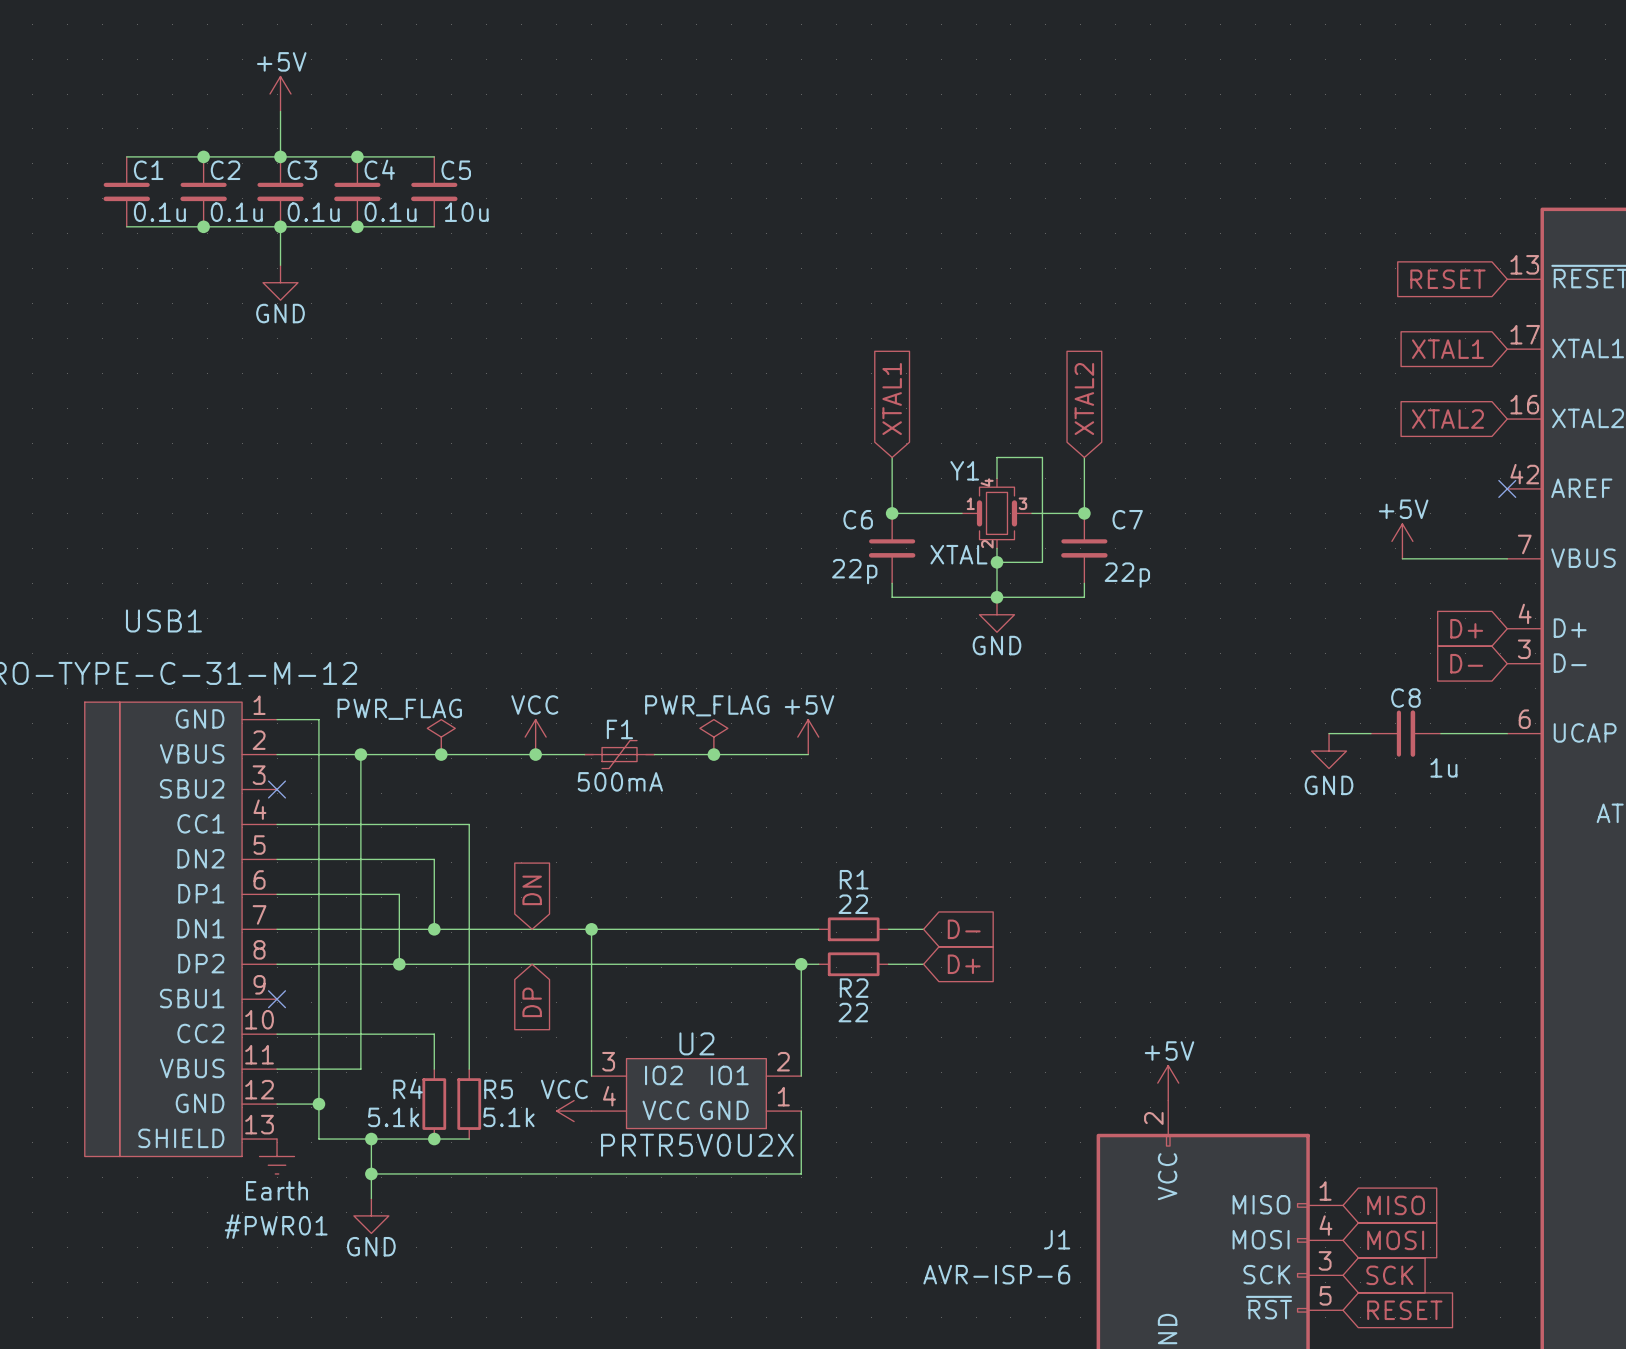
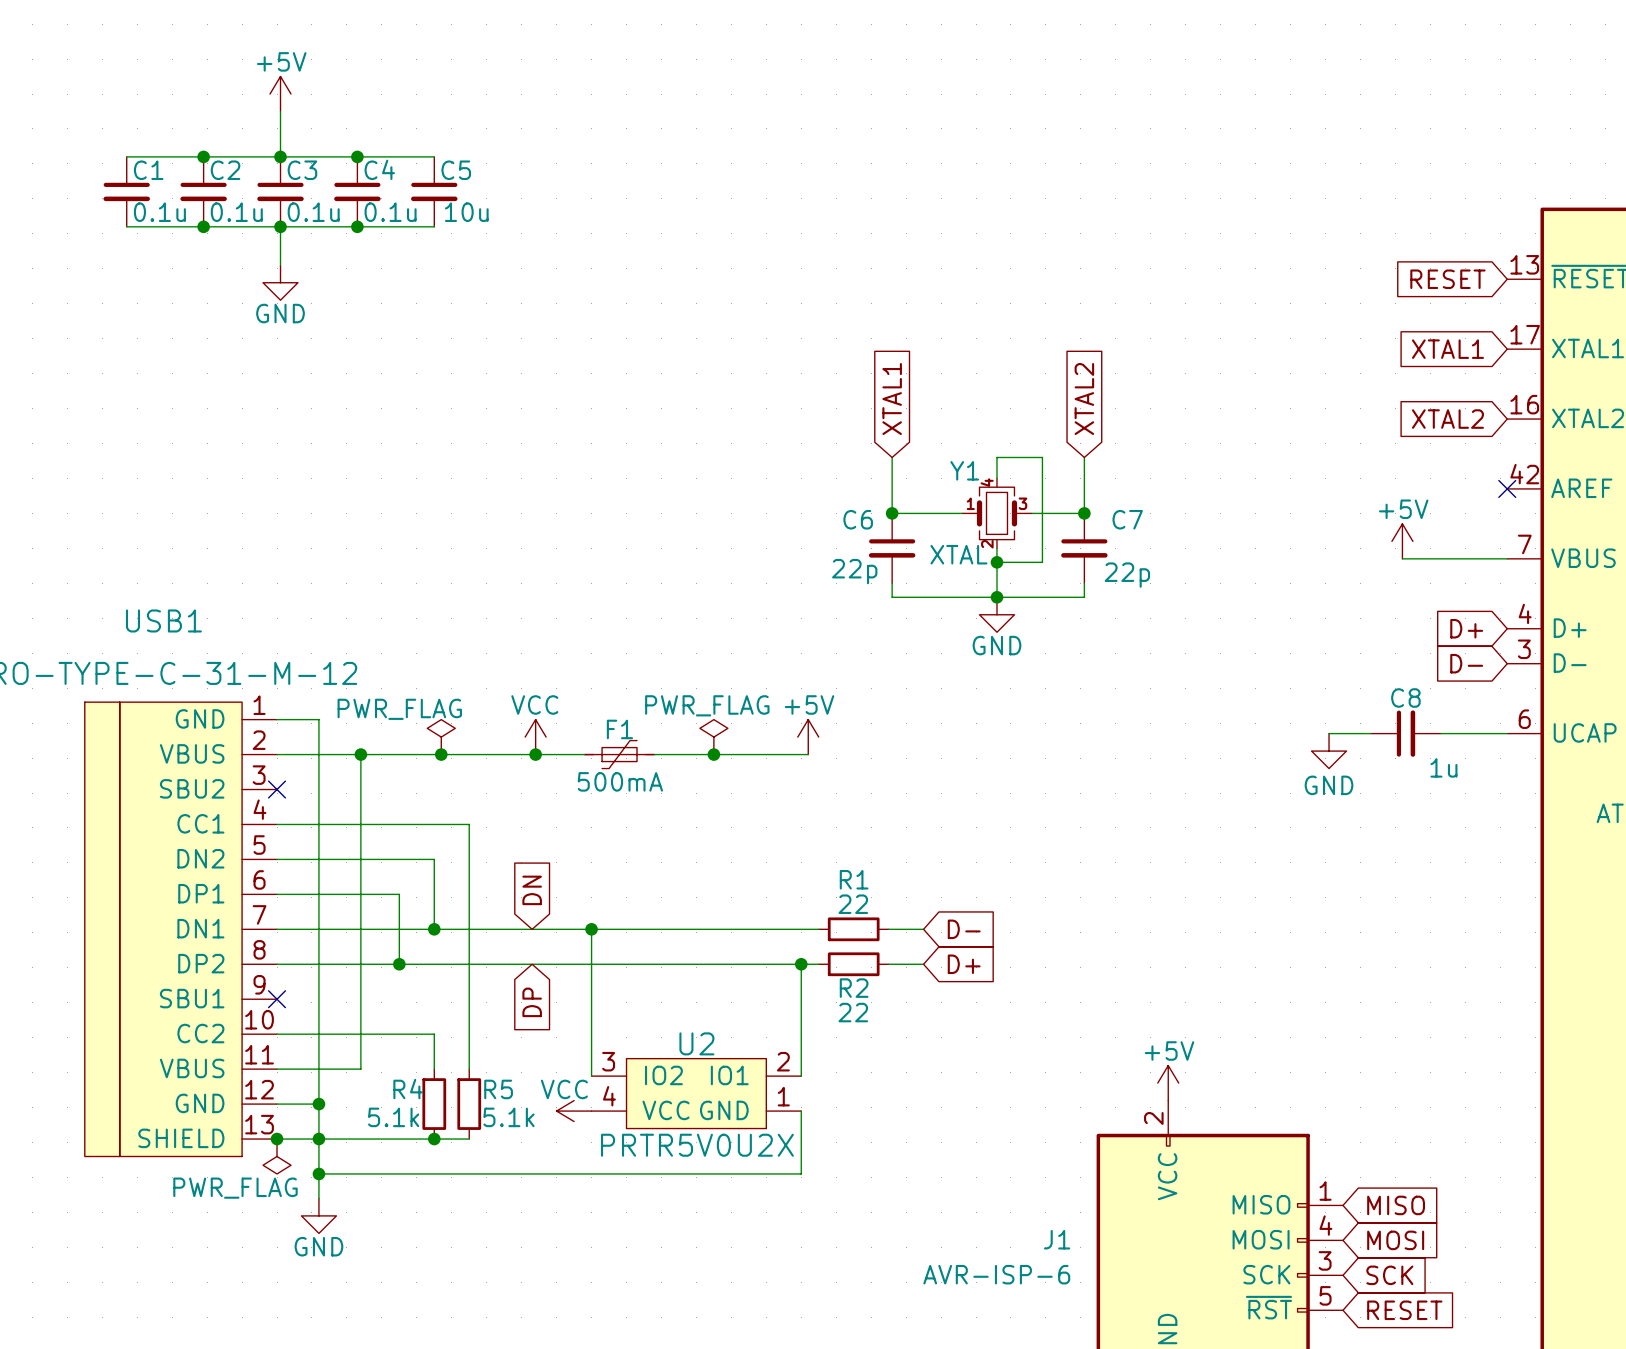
wire: none -> (277, 1139) (318, 1139) (318, 1198)
junction: none -> (277, 1139)
junction: none -> (318, 1139)
wire: (371, 1139) (371, 1198) -> none
junction: (371, 1139) -> none
power symbol: Earth (277, 1156) -> PWR_FLAG (277, 1156)
wire: none -> (318, 1173) (371, 1173)
junction: none -> (318, 1173)
junction: (371, 1173) -> none
power symbol position: GND (371, 1215) -> GND (318, 1215)

